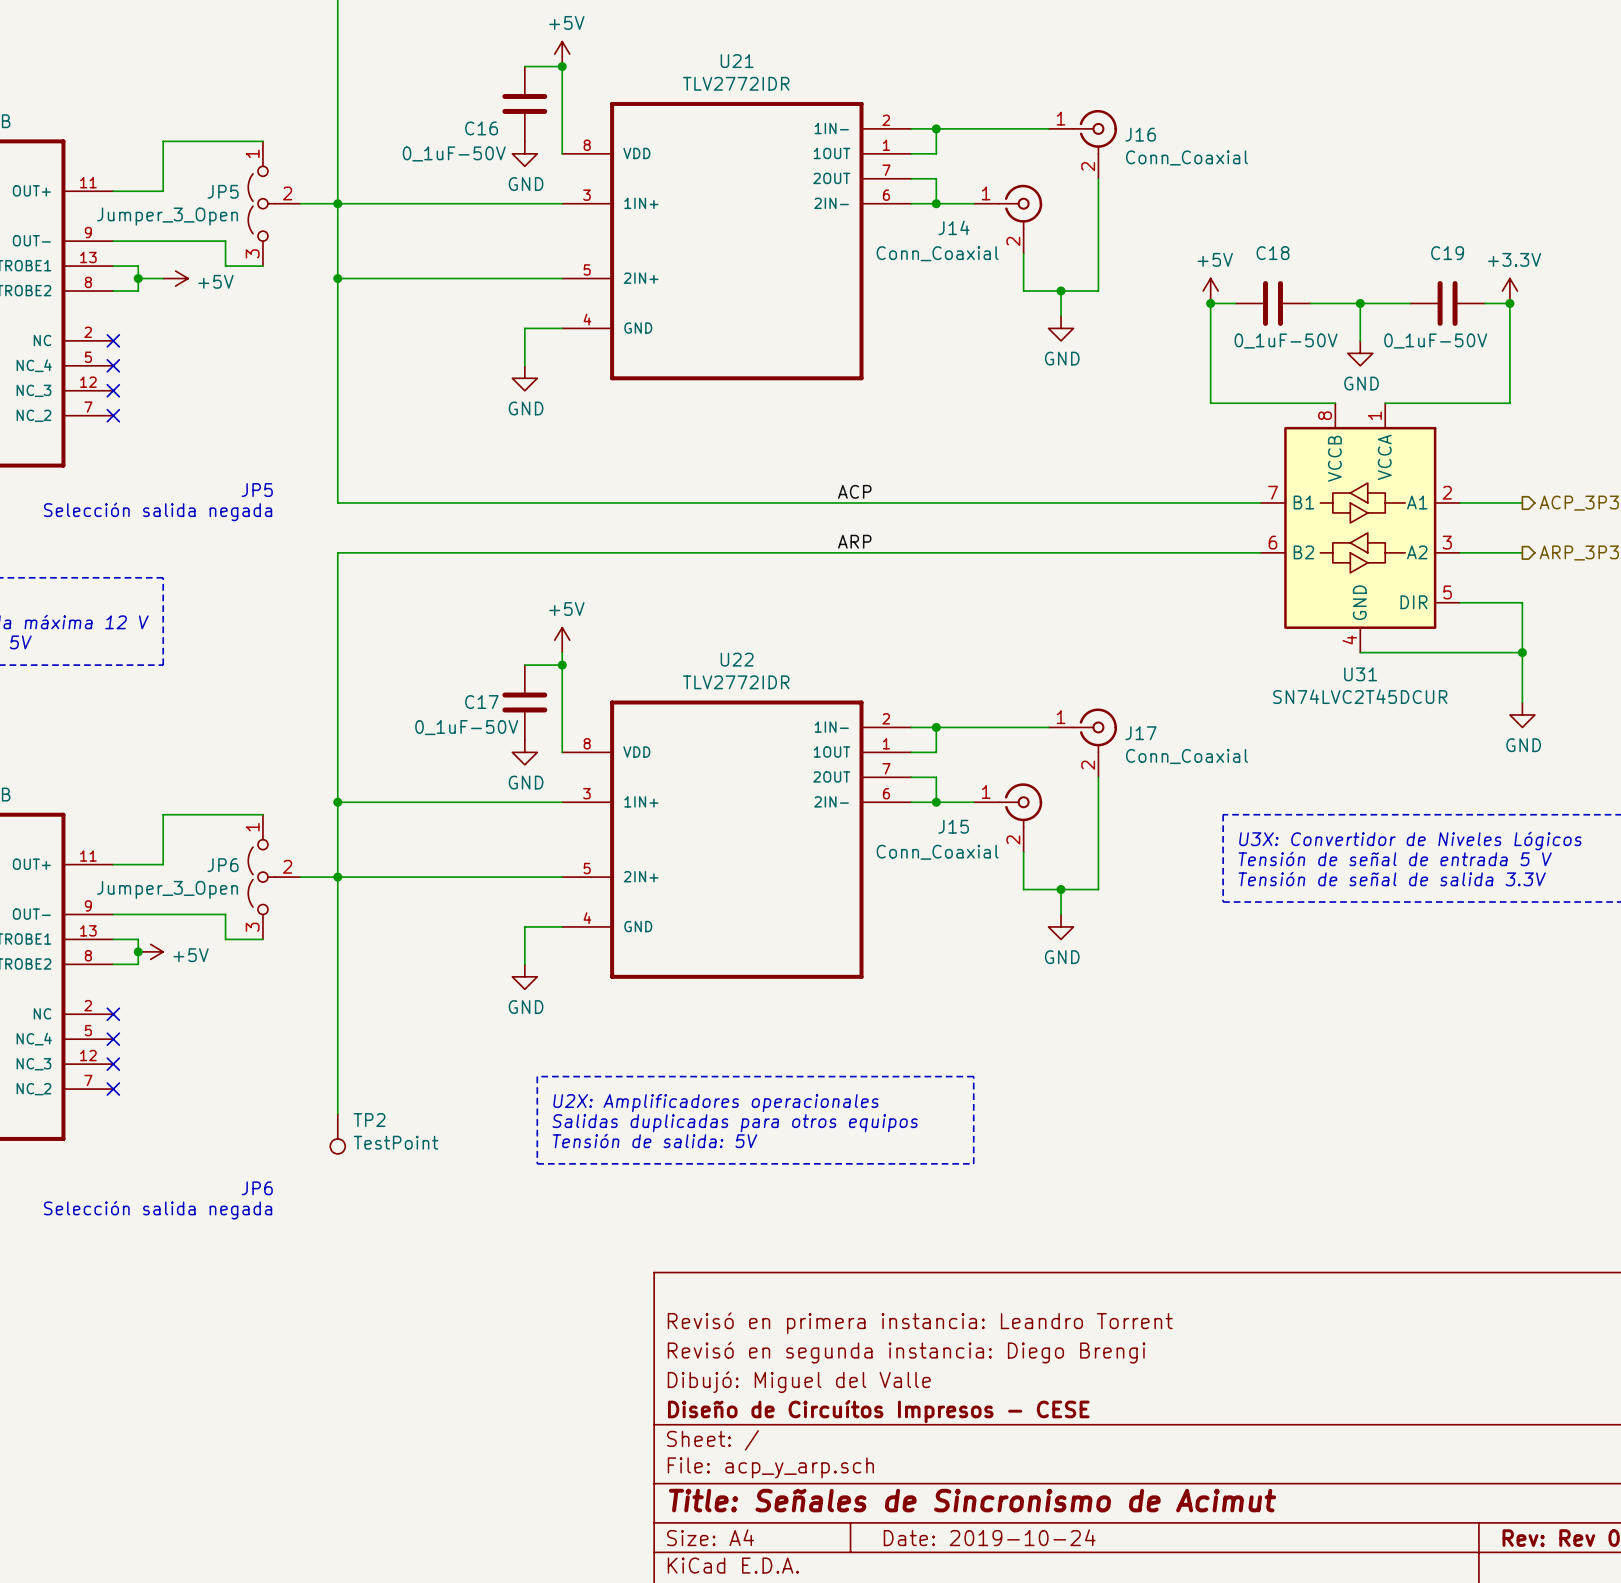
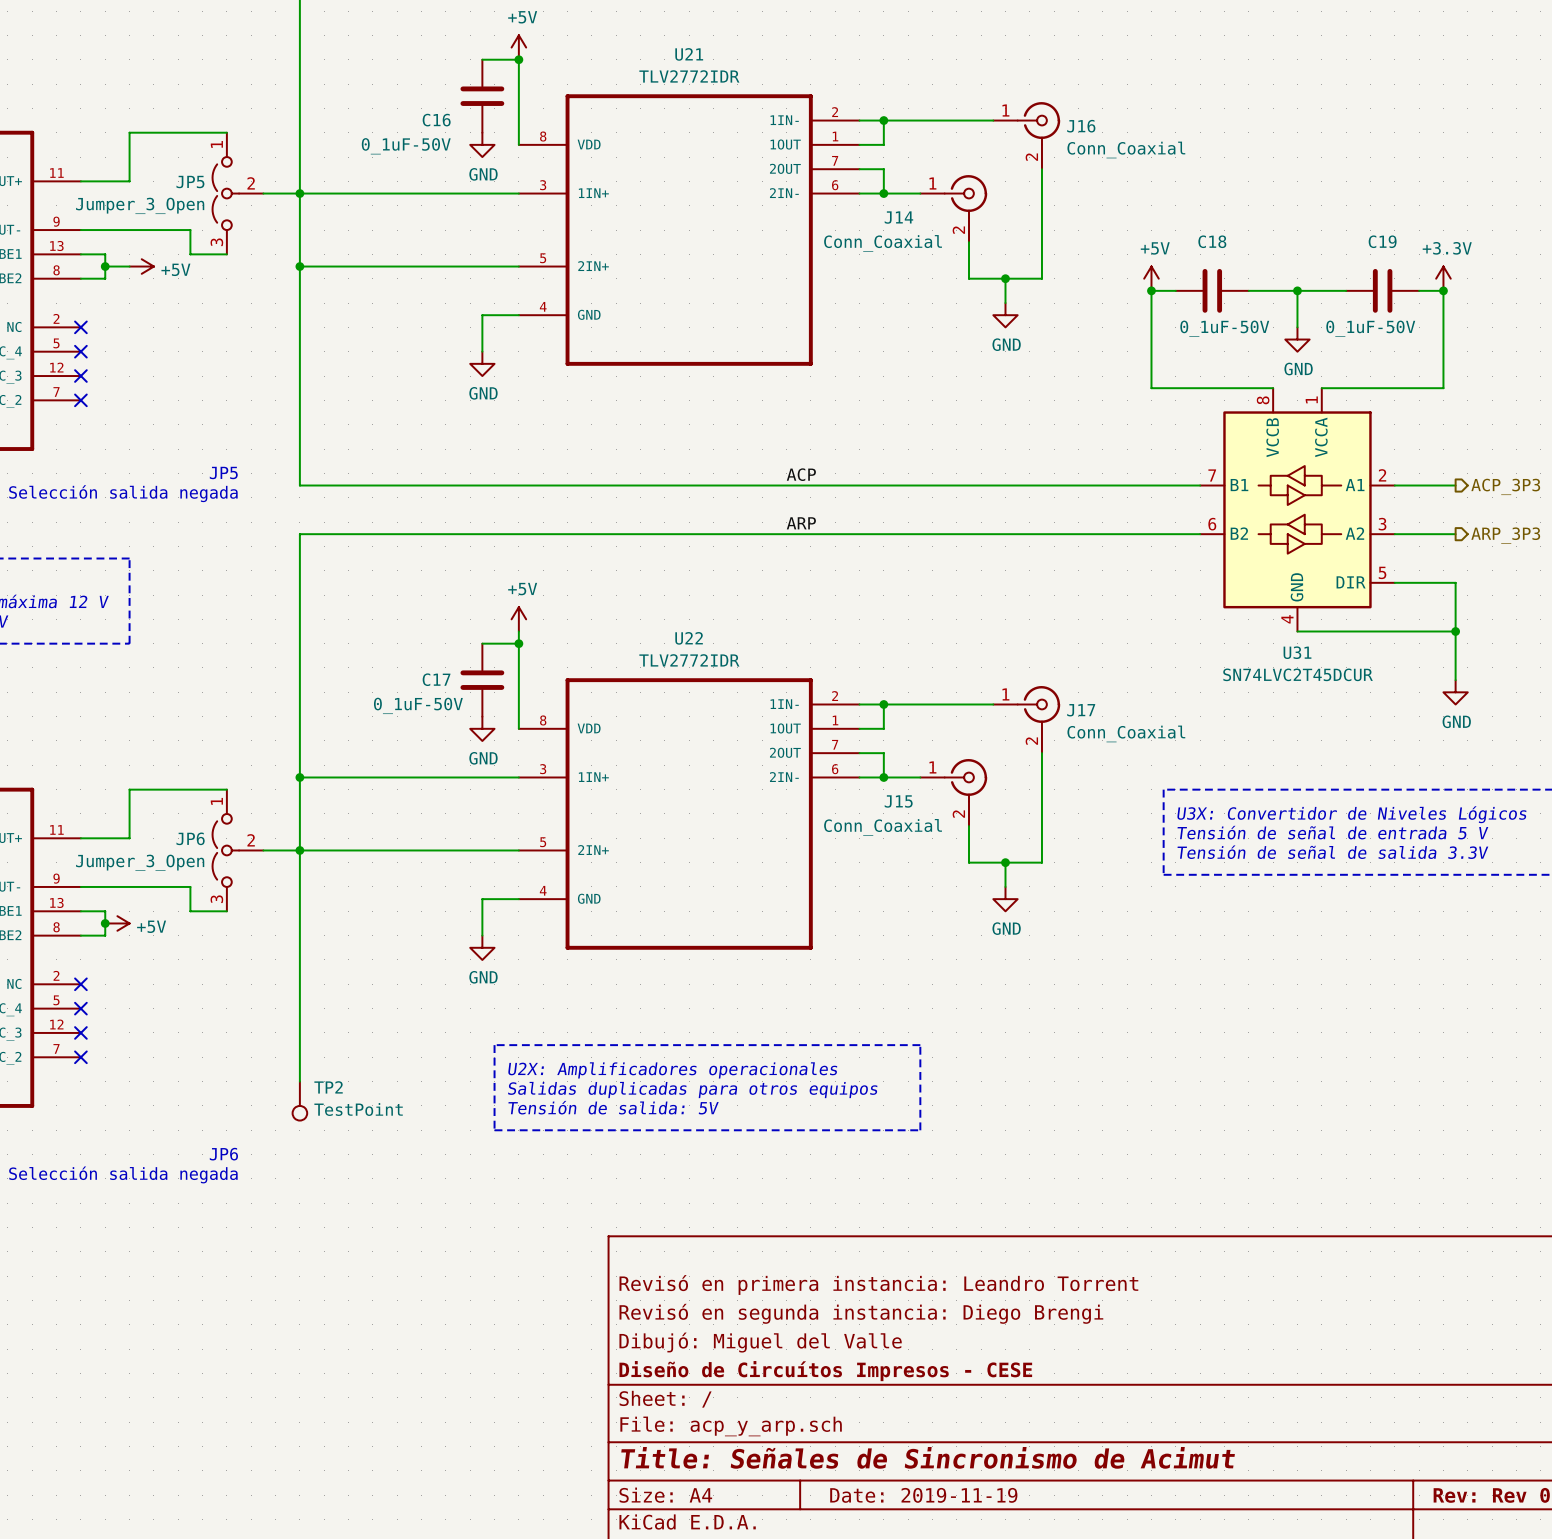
title block: Date: 2019-10-24 (989, 1537) -> Date: 2019-11-19 (923, 1495)

